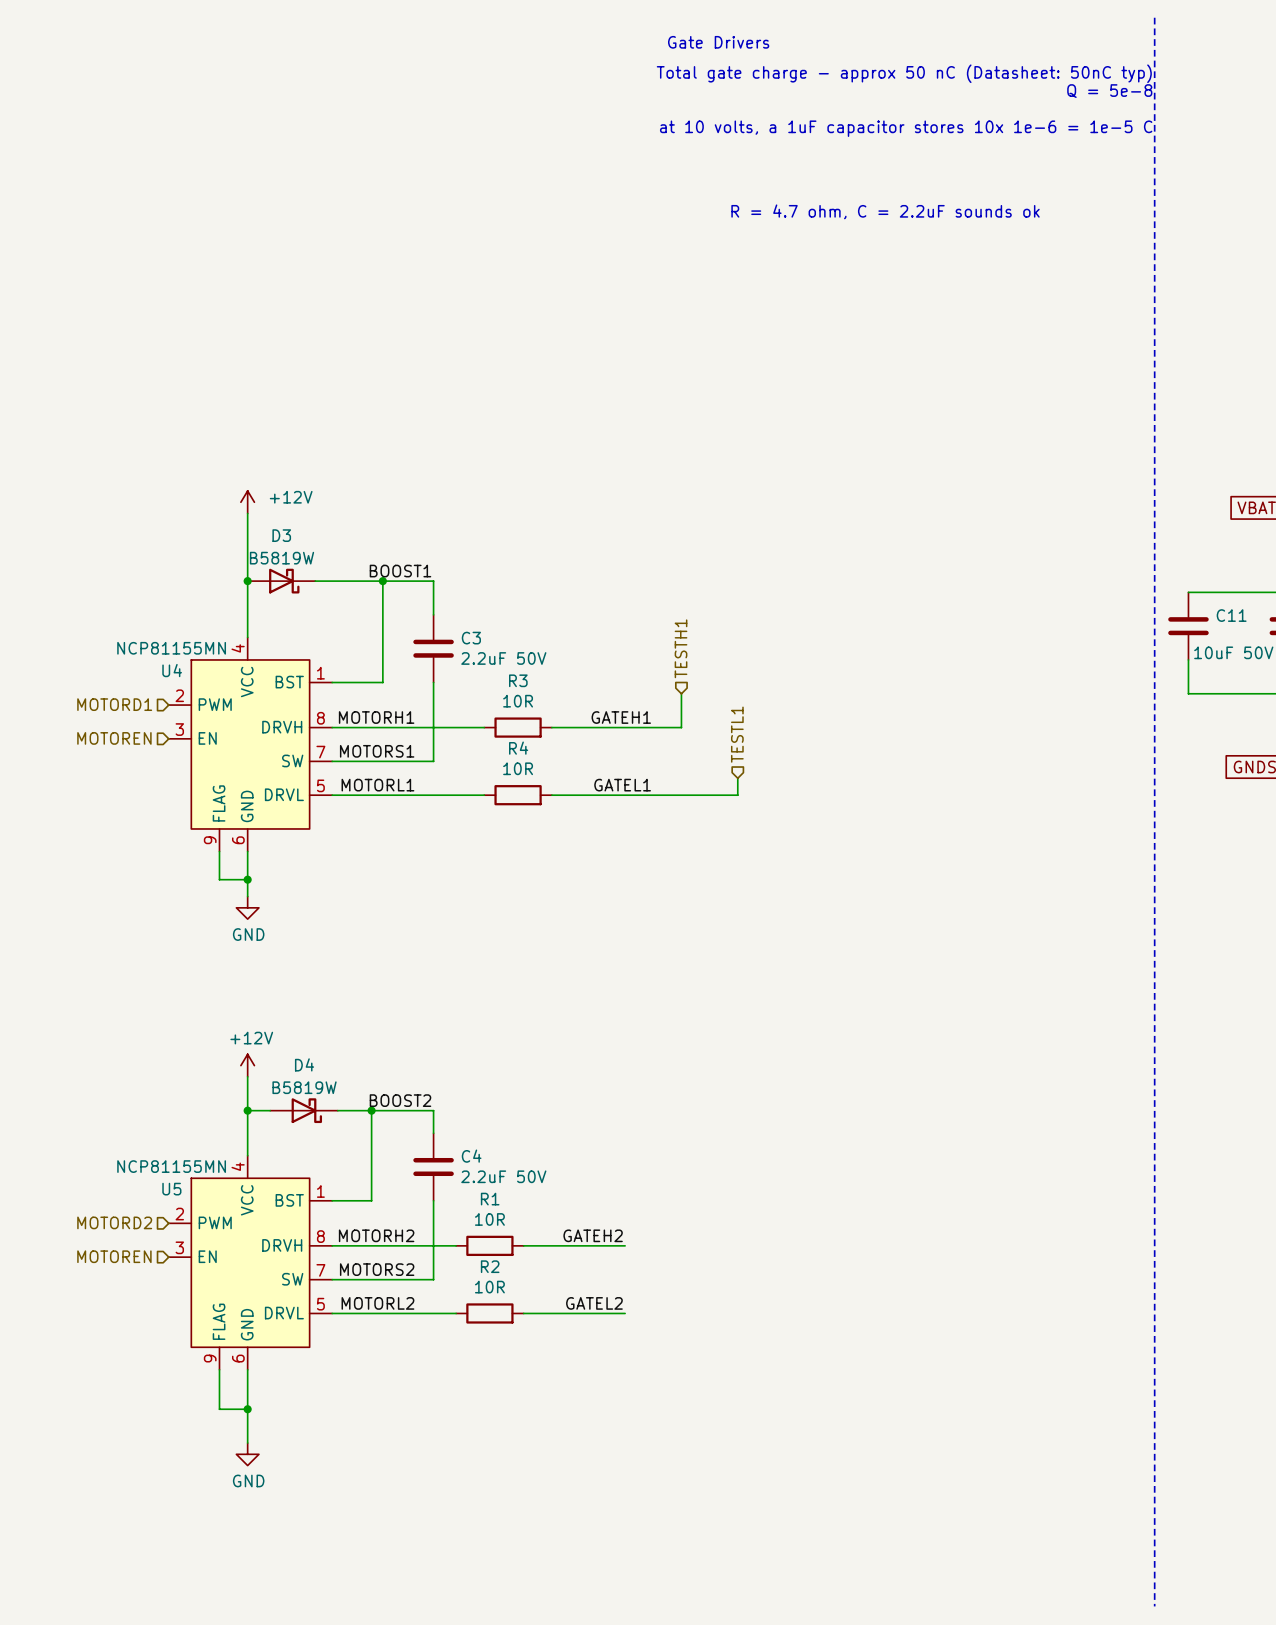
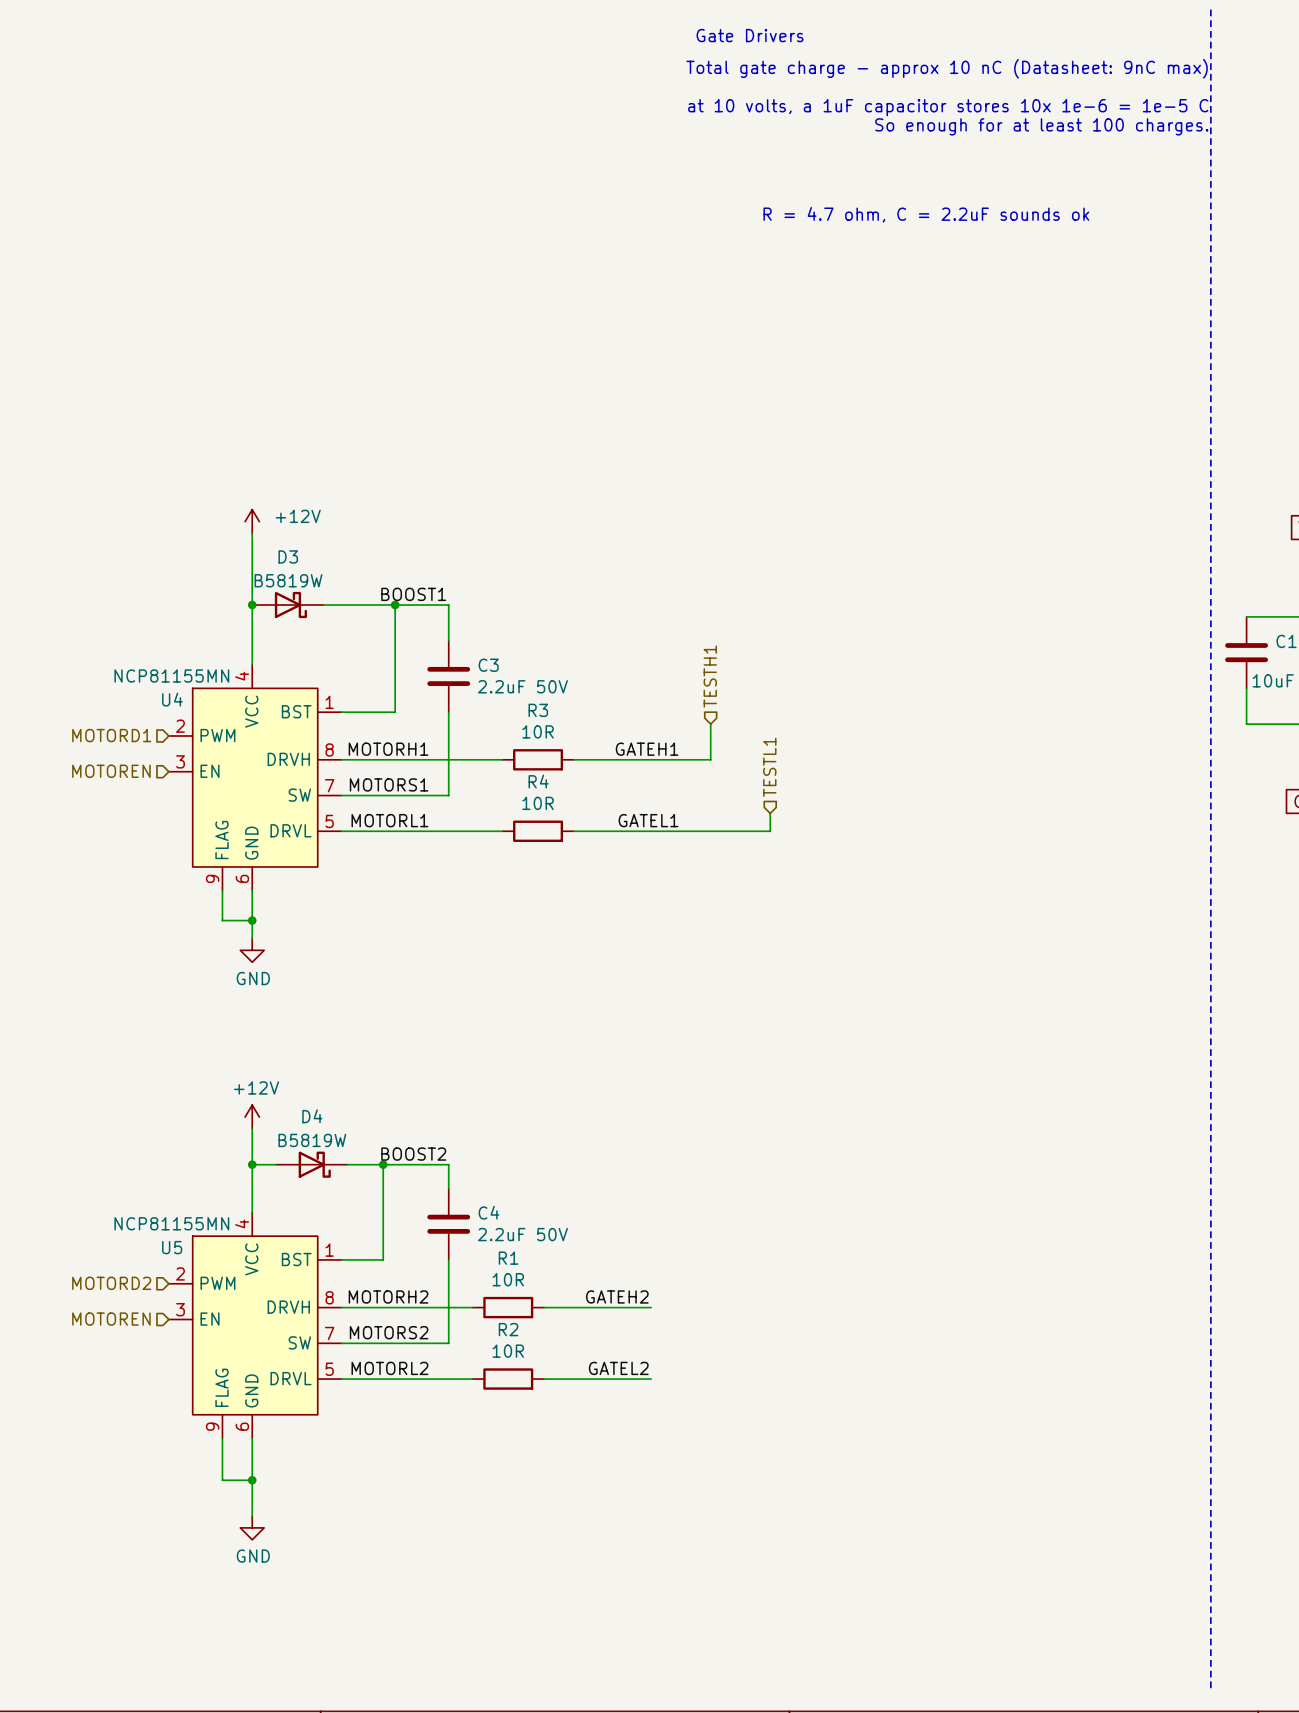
text: Total gate charge - approx 50 nC (Datasheet: 50nC typ) (904, 73) -> Total gate charge - approx 10 nC (Datasheet: 9nC max) (947, 68)
text: Q = 5e-8 (1109, 91) -> none
text: none -> at 10 volts, a 1uF capacitor stores 10x 1e-6 = 1e-5 C (948, 107)
text: at 10 volts, a 1uF capacitor stores 10x 1e-6 = 1e-5 C (906, 128) -> So enough for at least 100 charges. (1041, 126)

